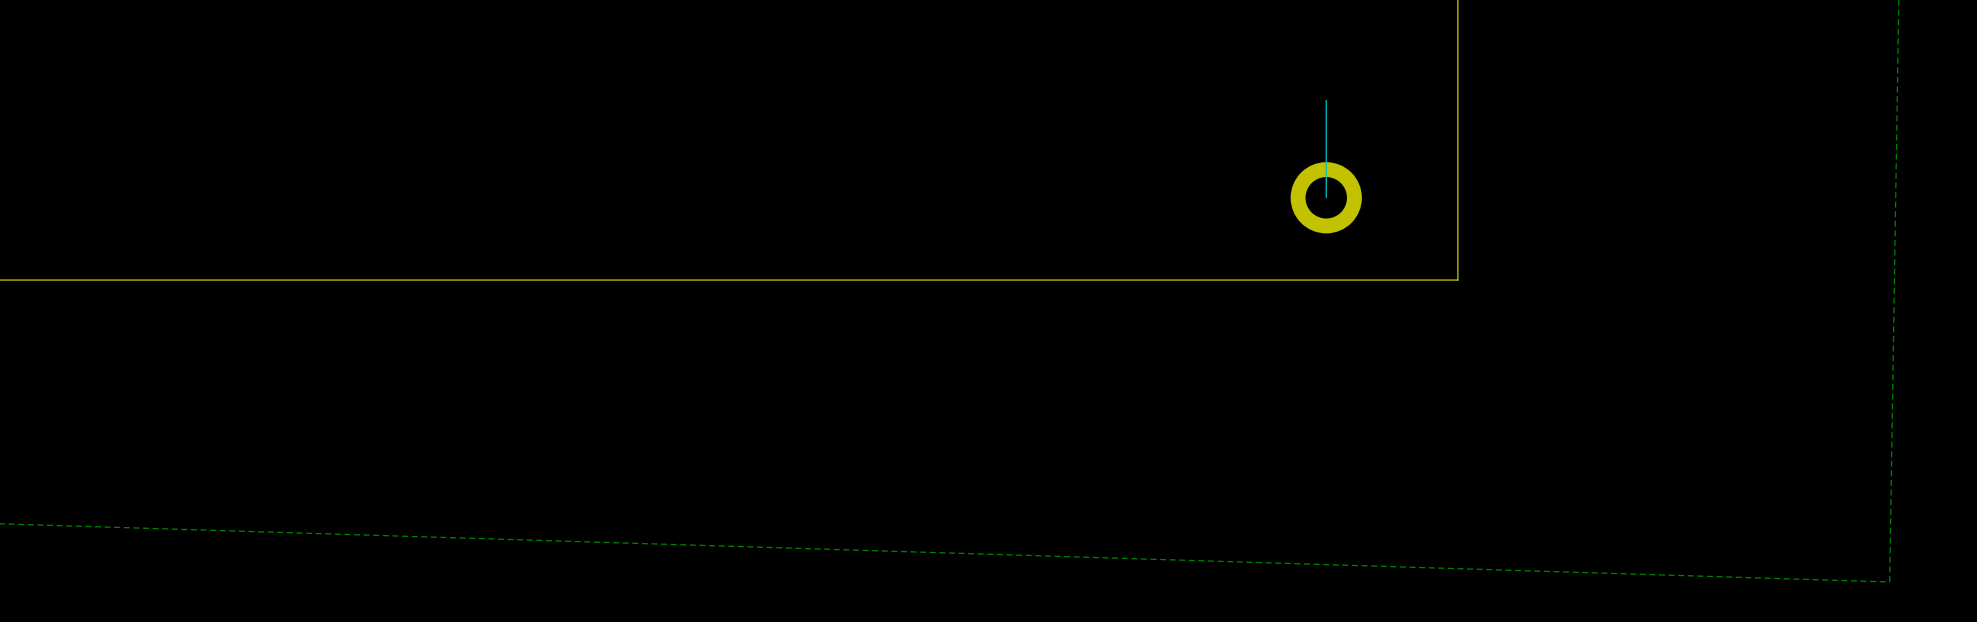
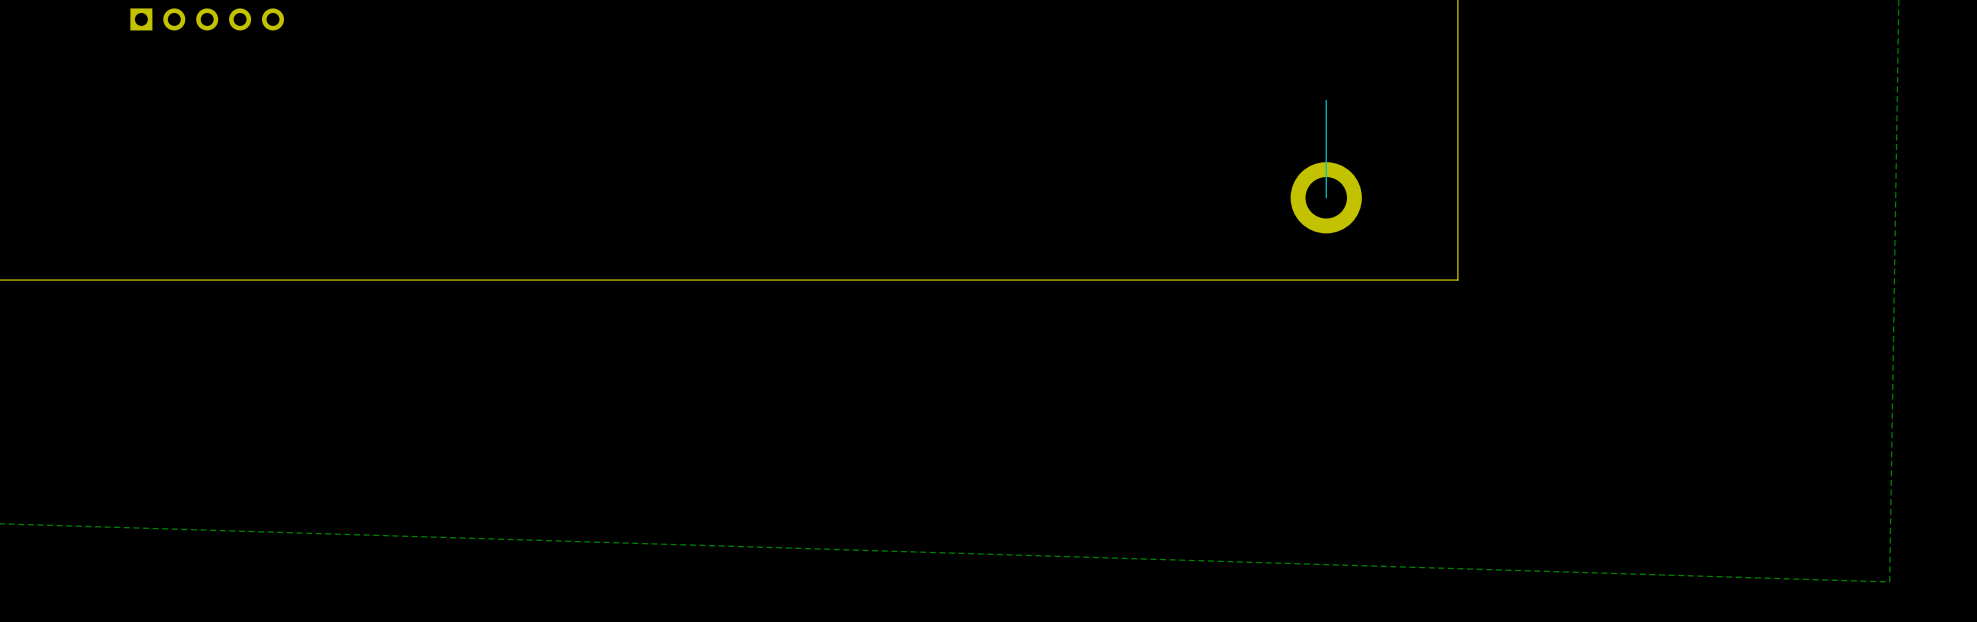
part: none -> (207, 19)

